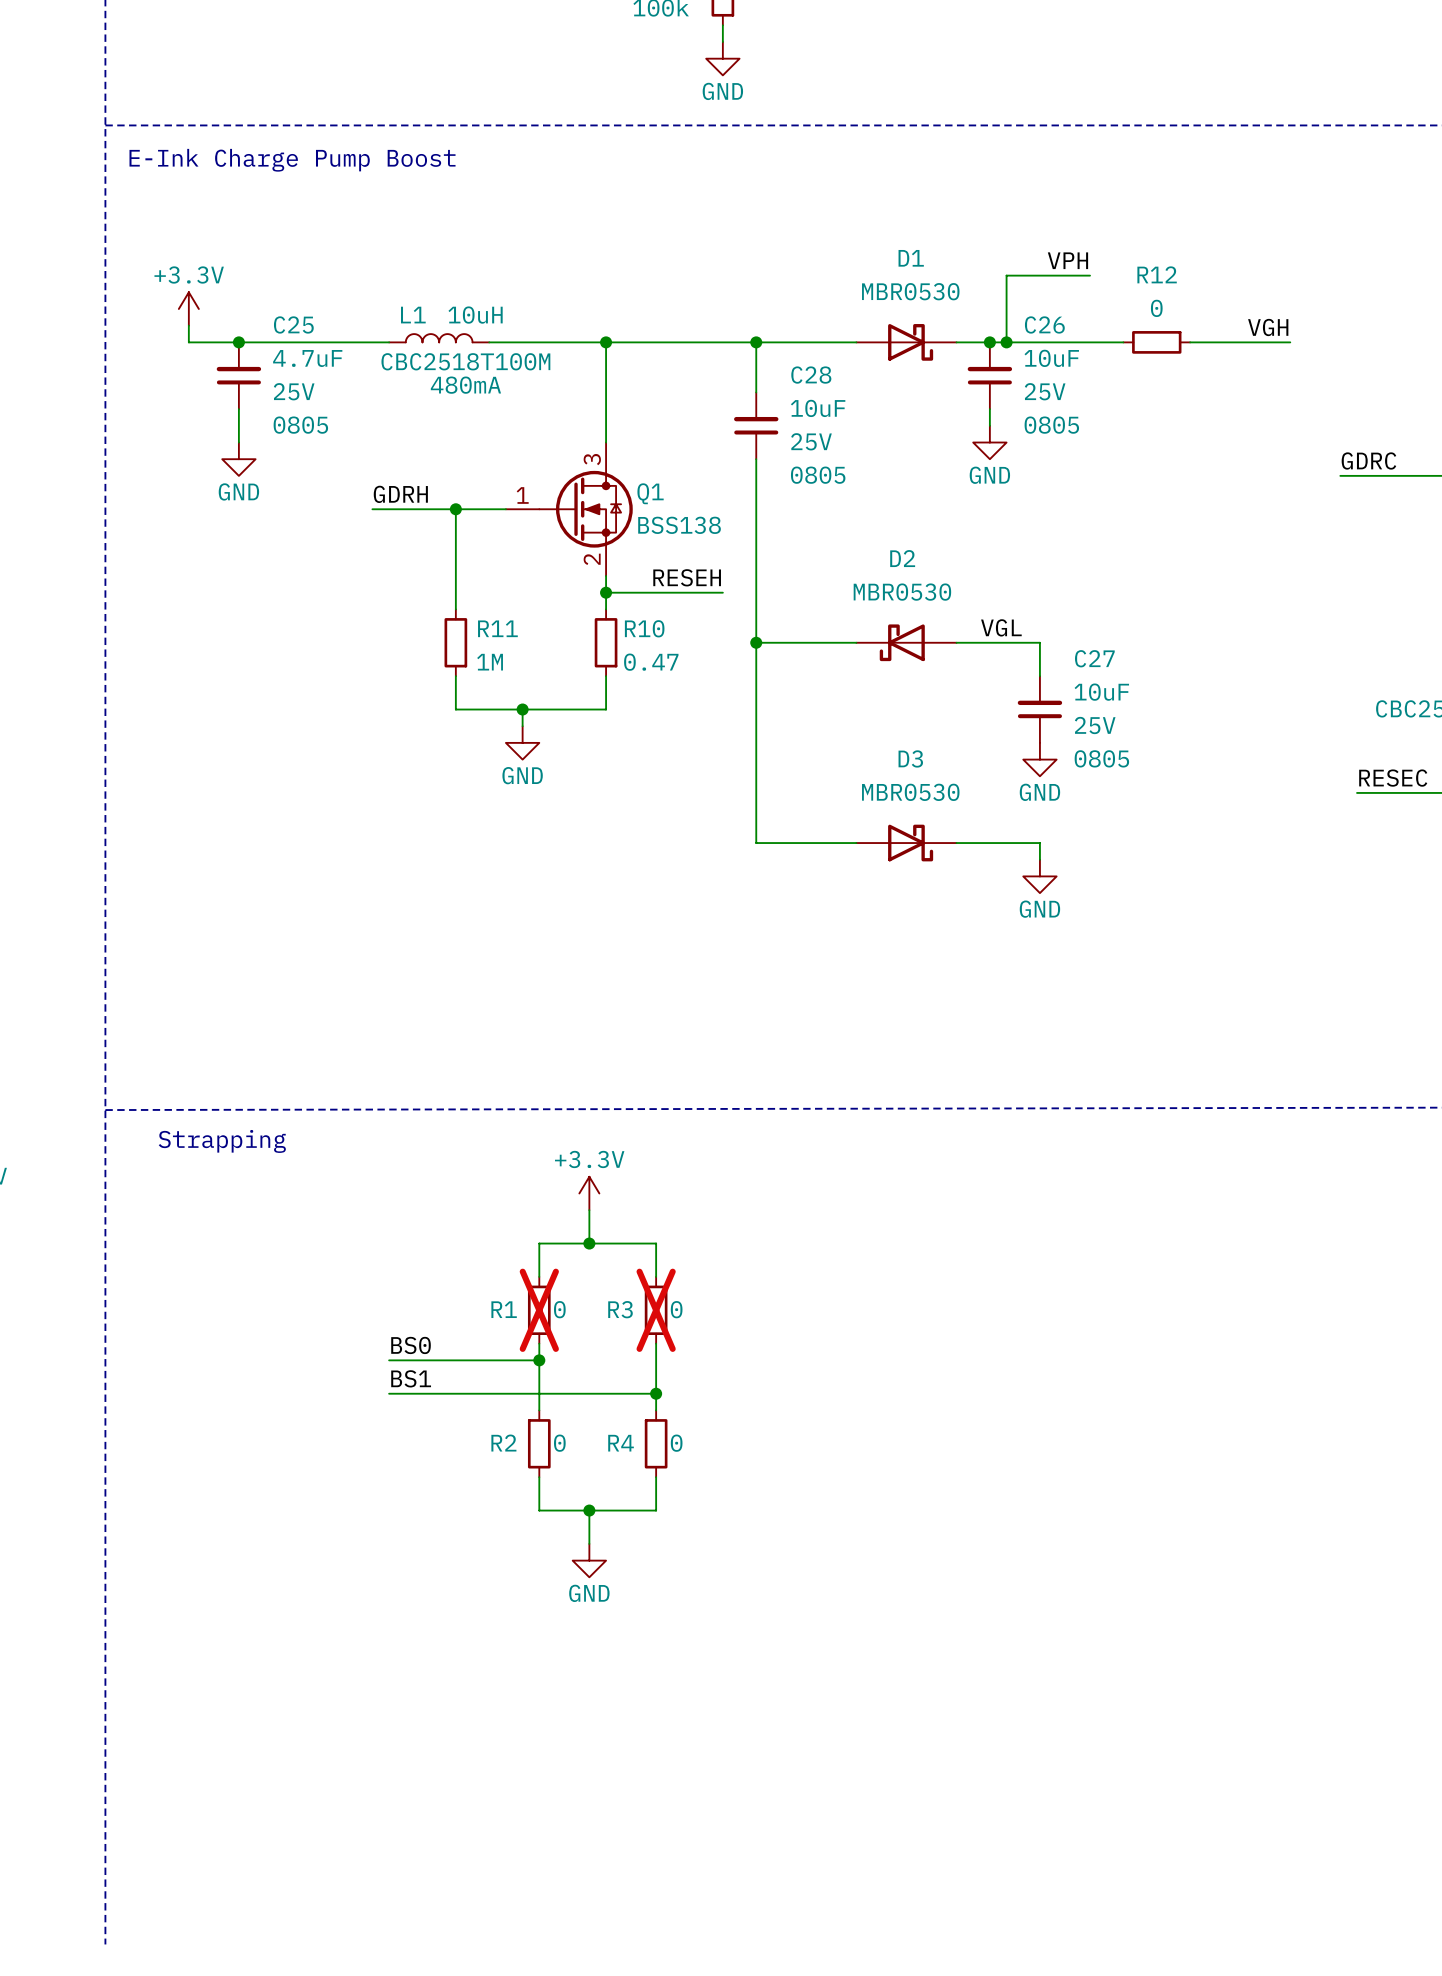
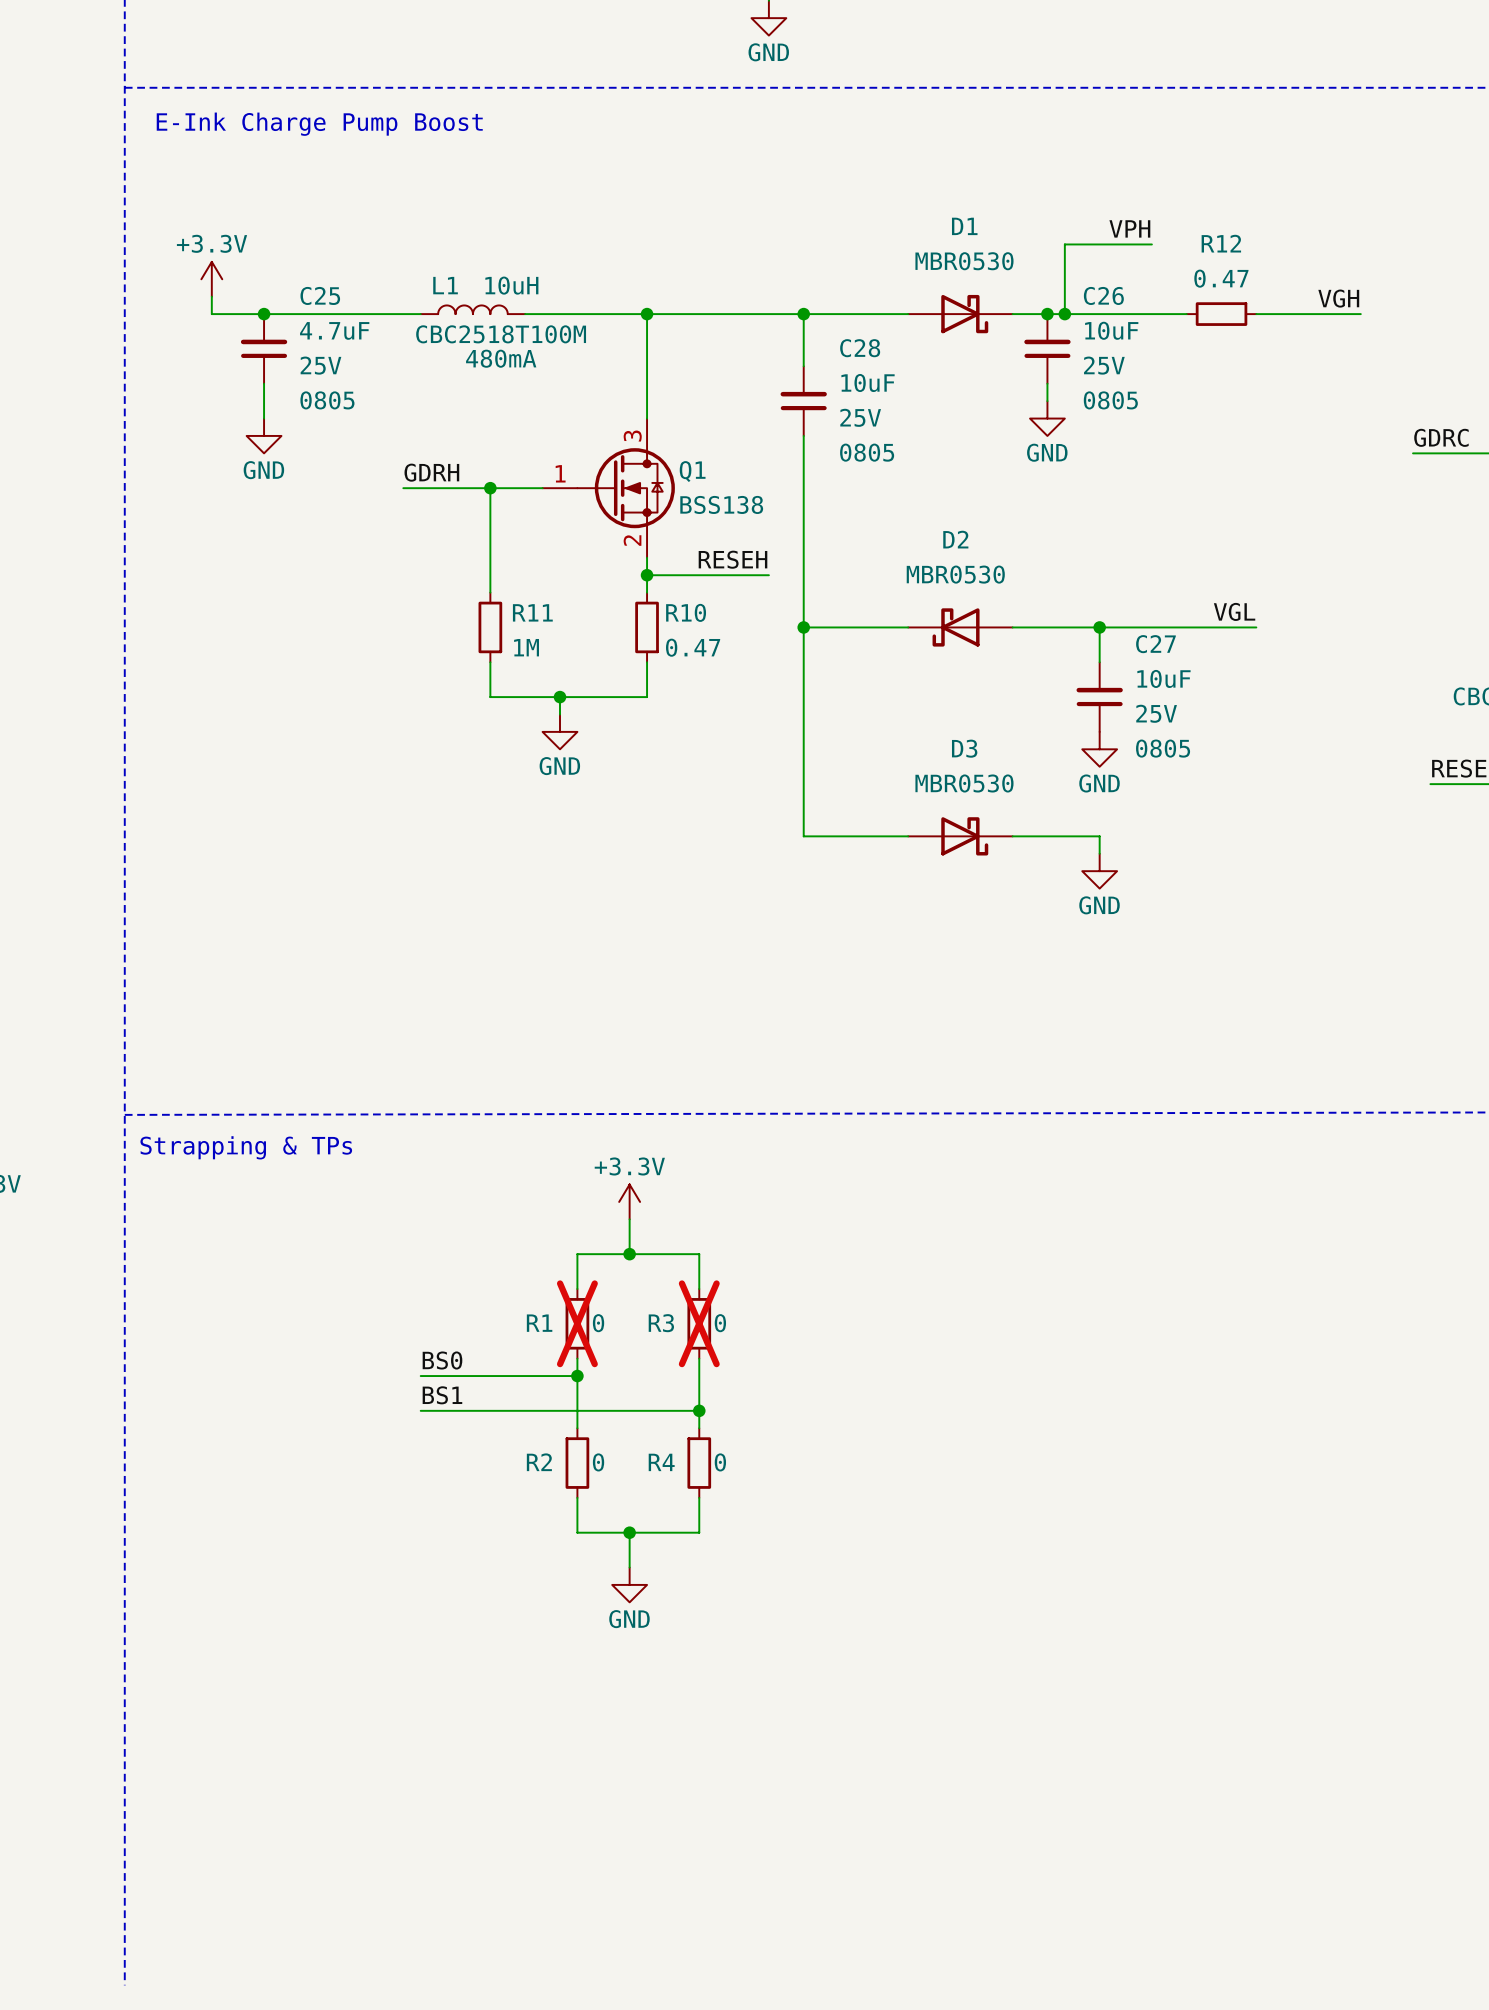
R12 value: 0 (1156, 308) -> 0.47 (1221, 278)
label position: VGL (1001, 627) -> VGL (1234, 611)
wire: none -> (1099, 627) (1256, 627)
junction: none -> (1099, 627)
text: Strapping (222, 1141) -> Strapping & TPs (246, 1147)

